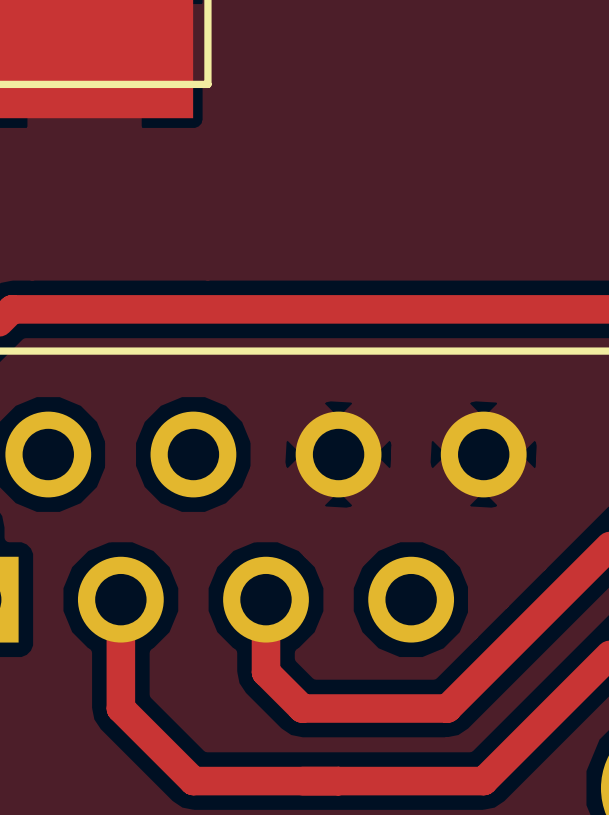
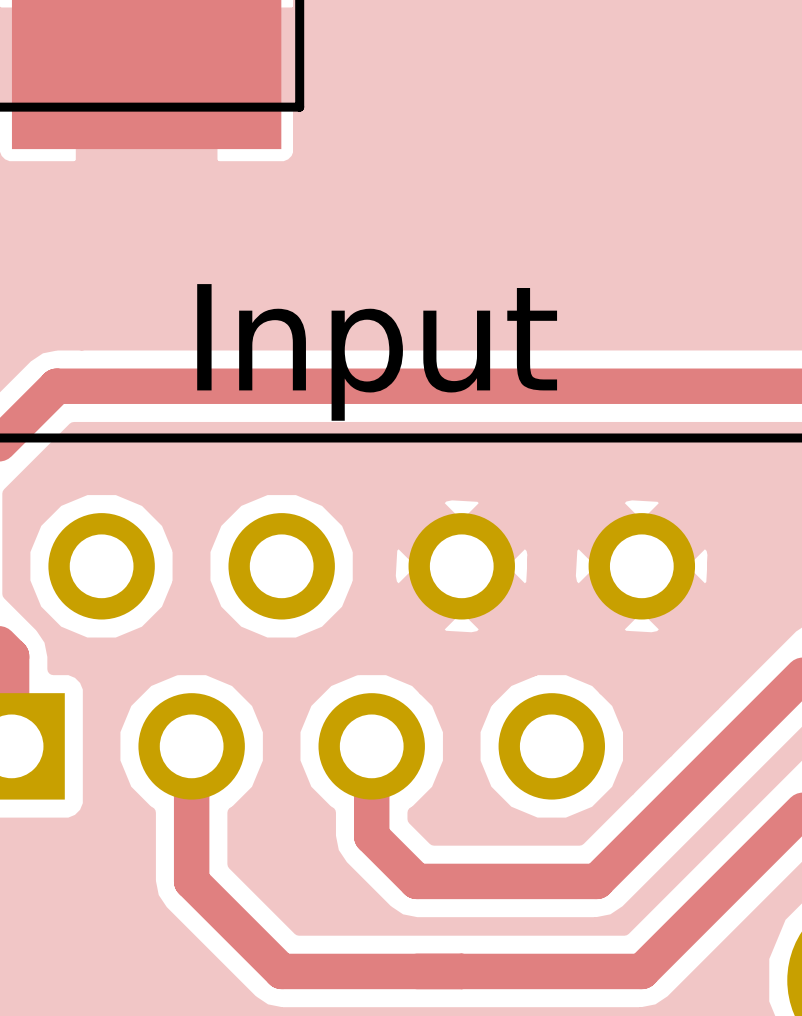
text: none -> Input (377, 352)

